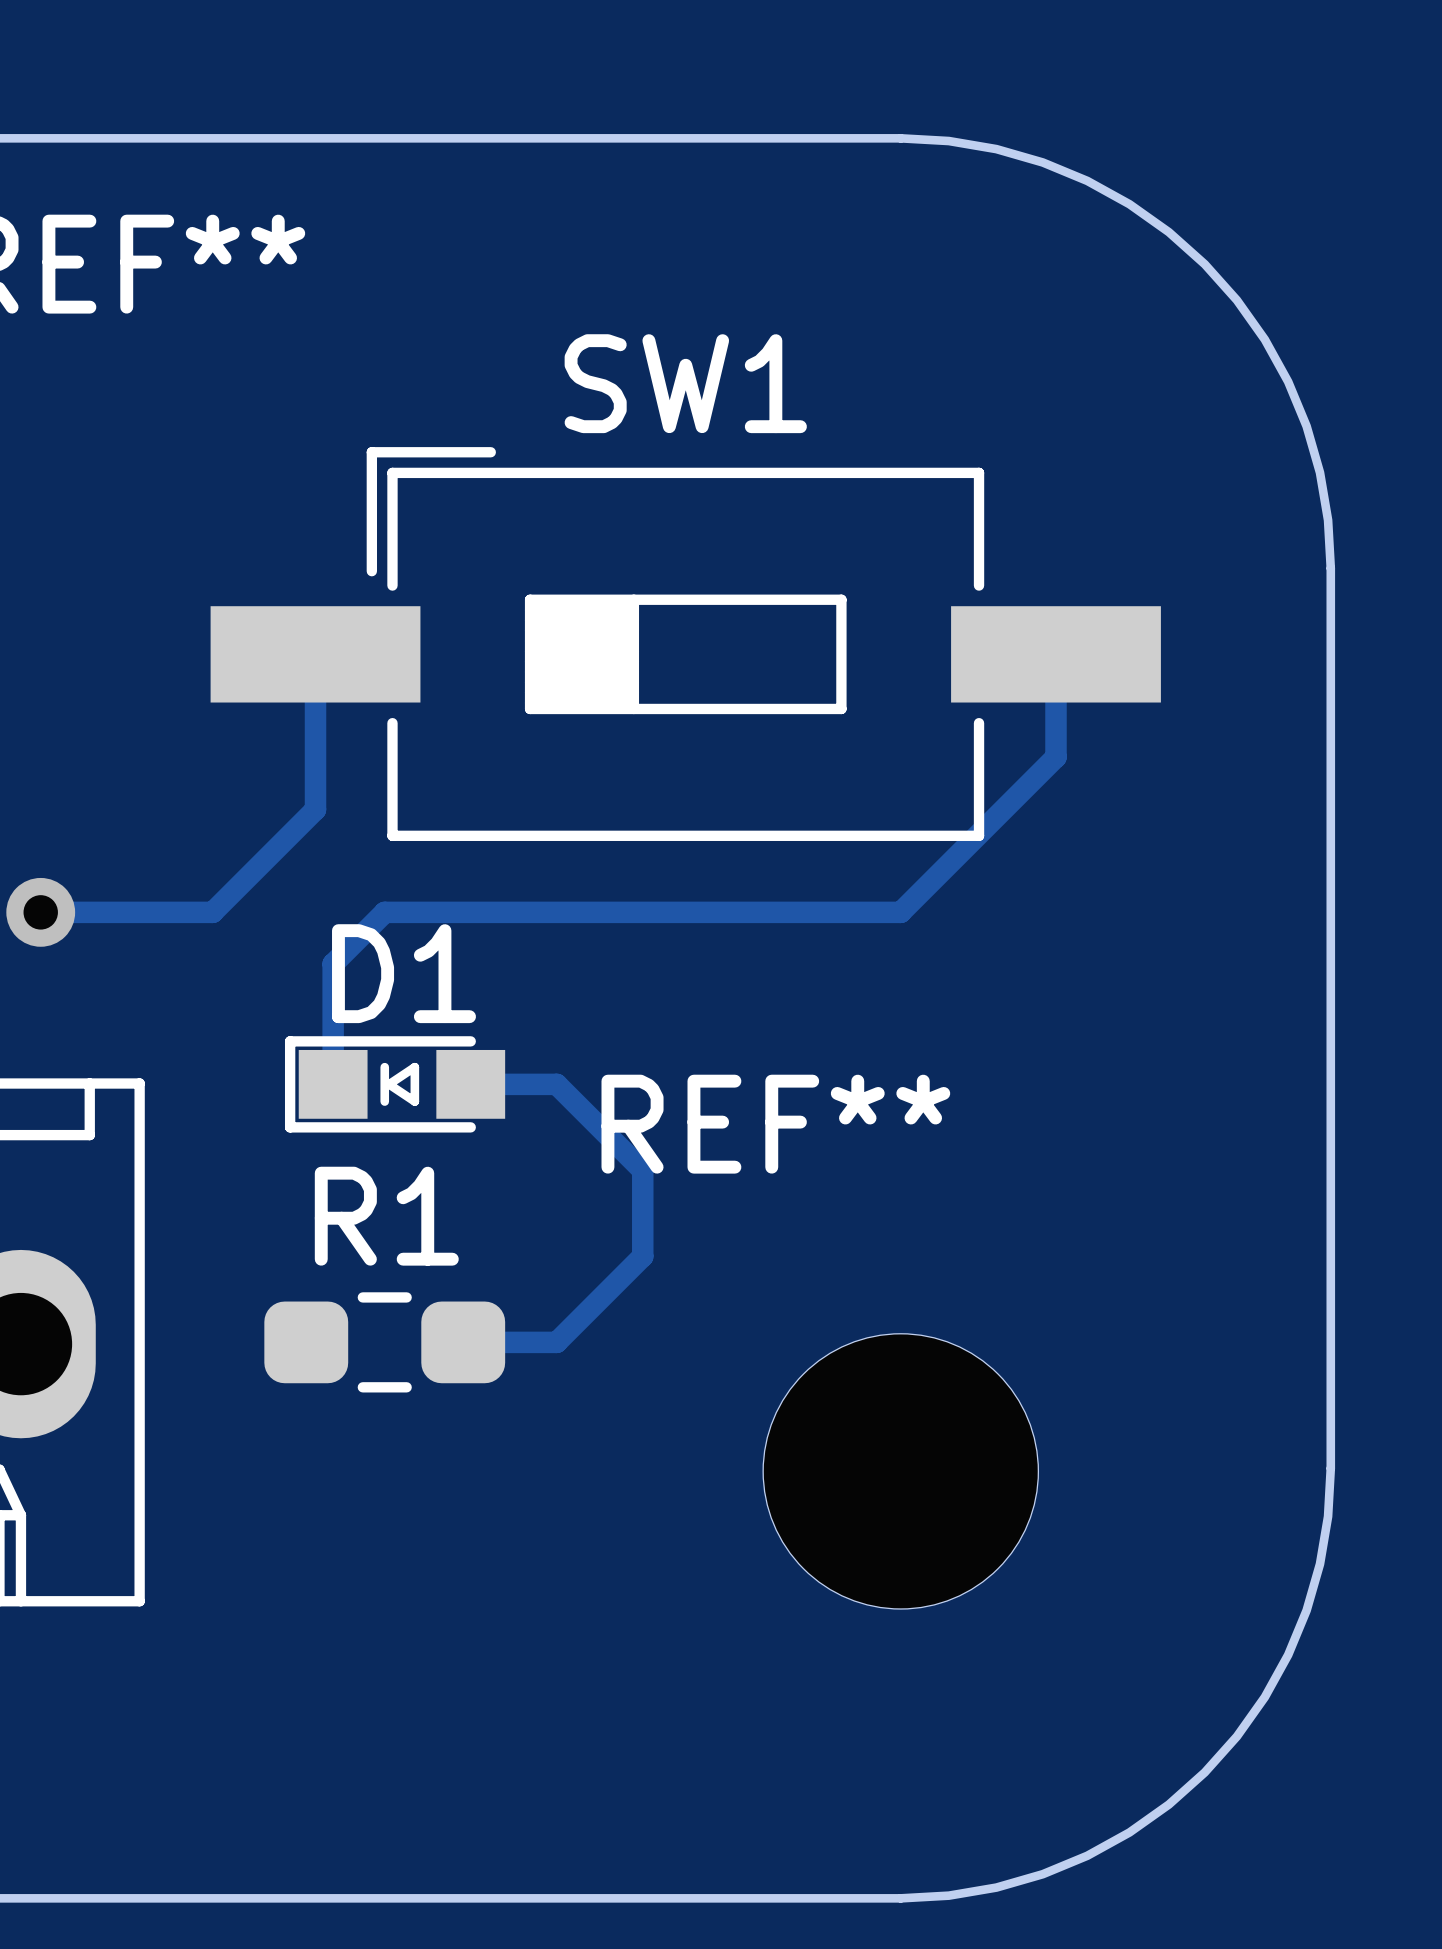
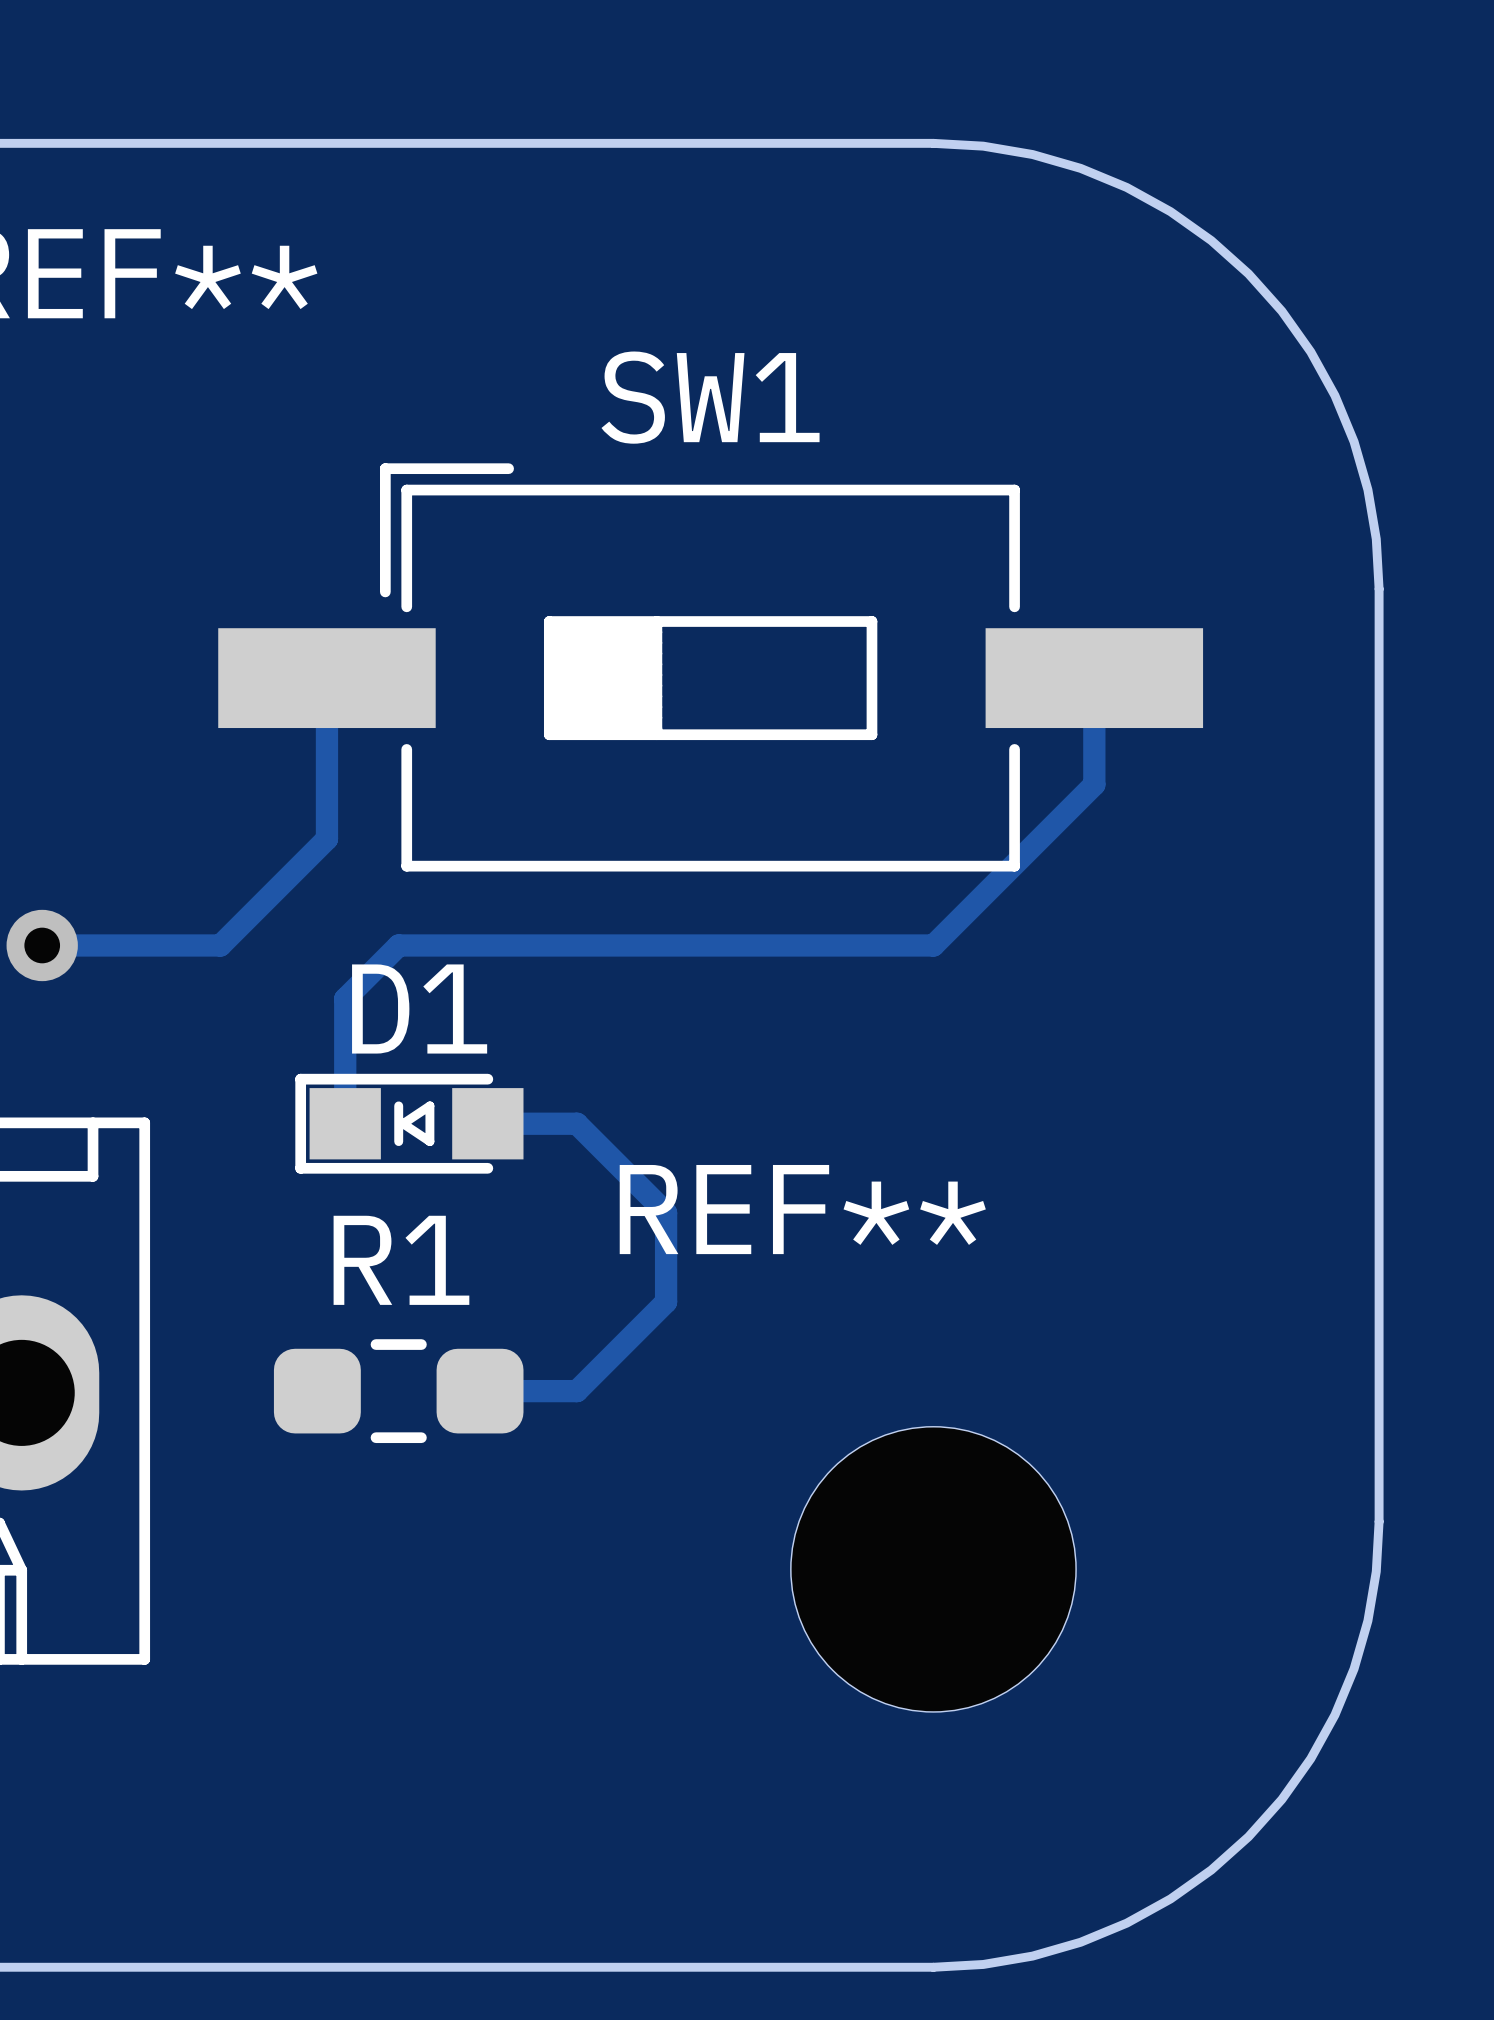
REF** position: (900, 1471) -> (933, 1569)

